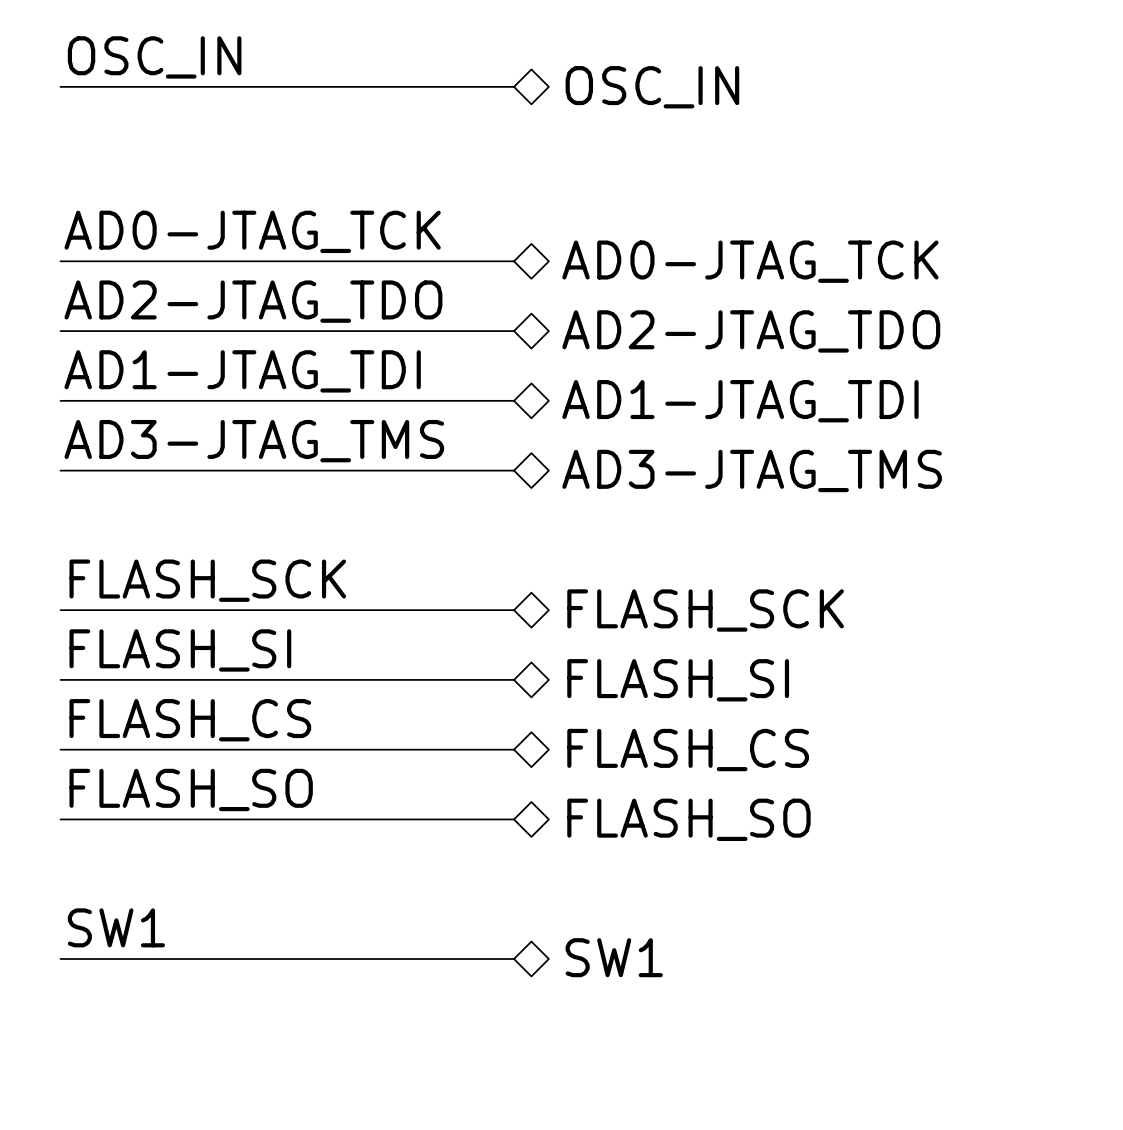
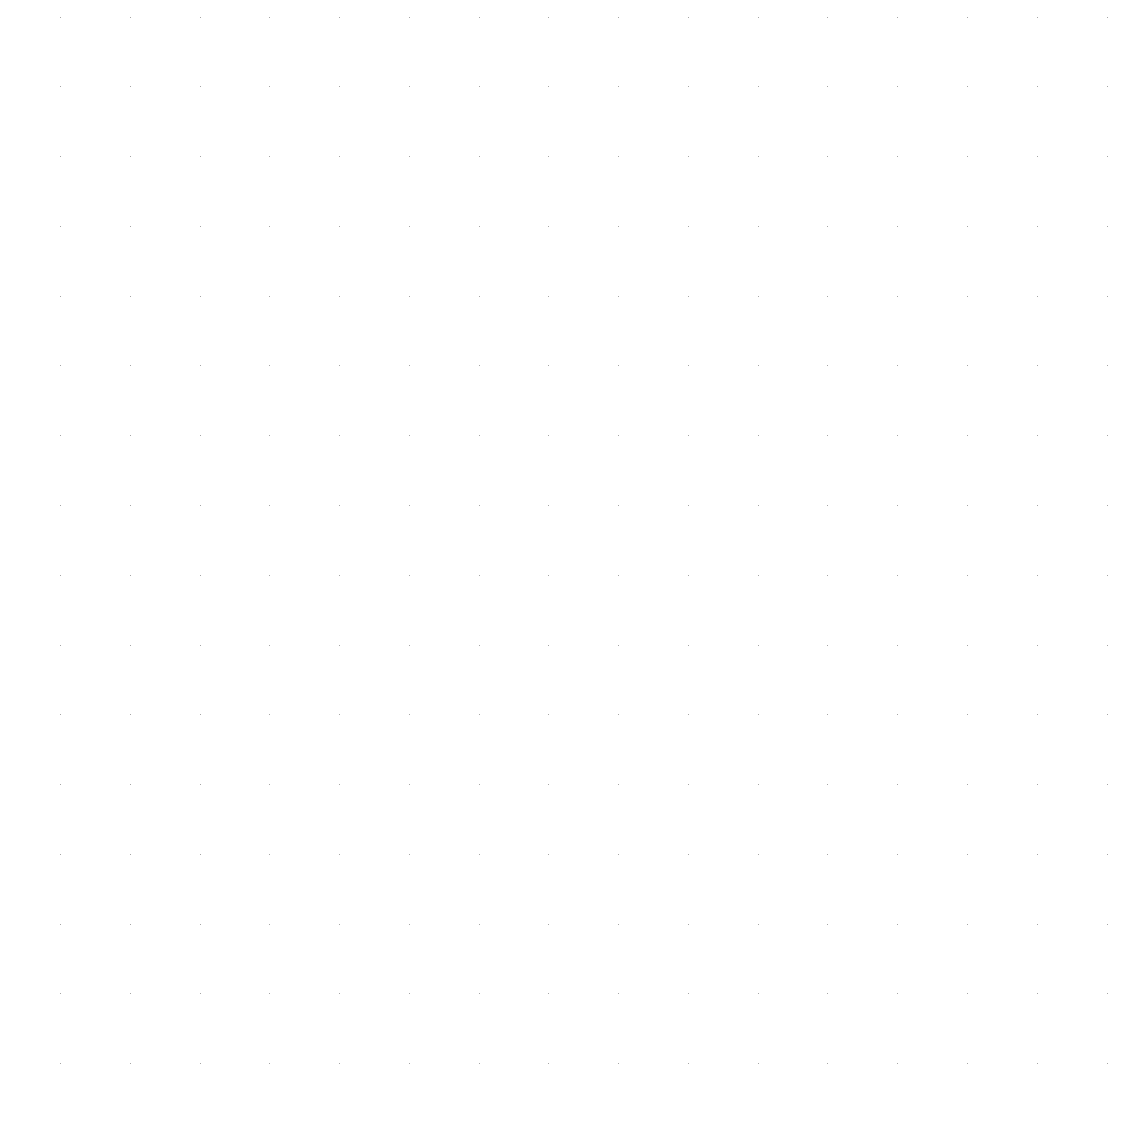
label: OSC_IN (154, 57) -> none
wire: (60, 86) (513, 86) -> none
hierarchical label: OSC_IN (652, 87) -> none
label: AD0-JTAG_TCK (252, 231) -> none
wire: (60, 261) (513, 261) -> none
hierarchical label: AD0-JTAG_TCK (750, 261) -> none
label: AD2-JTAG_TDO (253, 301) -> none
wire: (60, 331) (513, 331) -> none
hierarchical label: AD2-JTAG_TDO (751, 331) -> none
label: AD1-JTAG_TDI (242, 371) -> none
wire: (60, 400) (513, 400) -> none
hierarchical label: AD1-JTAG_TDI (740, 401) -> none
label: AD3-JTAG_TMS (254, 441) -> none
wire: (60, 470) (513, 470) -> none
hierarchical label: AD3-JTAG_TMS (752, 470) -> none
label: FLASH_SCK (207, 580) -> none
wire: (60, 610) (513, 610) -> none
hierarchical label: FLASH_SCK (705, 610) -> none
label: FLASH_SI (180, 650) -> none
wire: (60, 679) (513, 679) -> none
hierarchical label: FLASH_SI (678, 680) -> none
label: FLASH_CS (190, 720) -> none
wire: (60, 749) (513, 749) -> none
hierarchical label: FLASH_CS (688, 750) -> none
label: FLASH_SO (191, 789) -> none
wire: (60, 819) (513, 819) -> none
hierarchical label: FLASH_SO (688, 819) -> none
label: SW1 (116, 927) -> none
hierarchical label: SW1 (614, 957) -> none
wire: (60, 958) (513, 958) -> none

